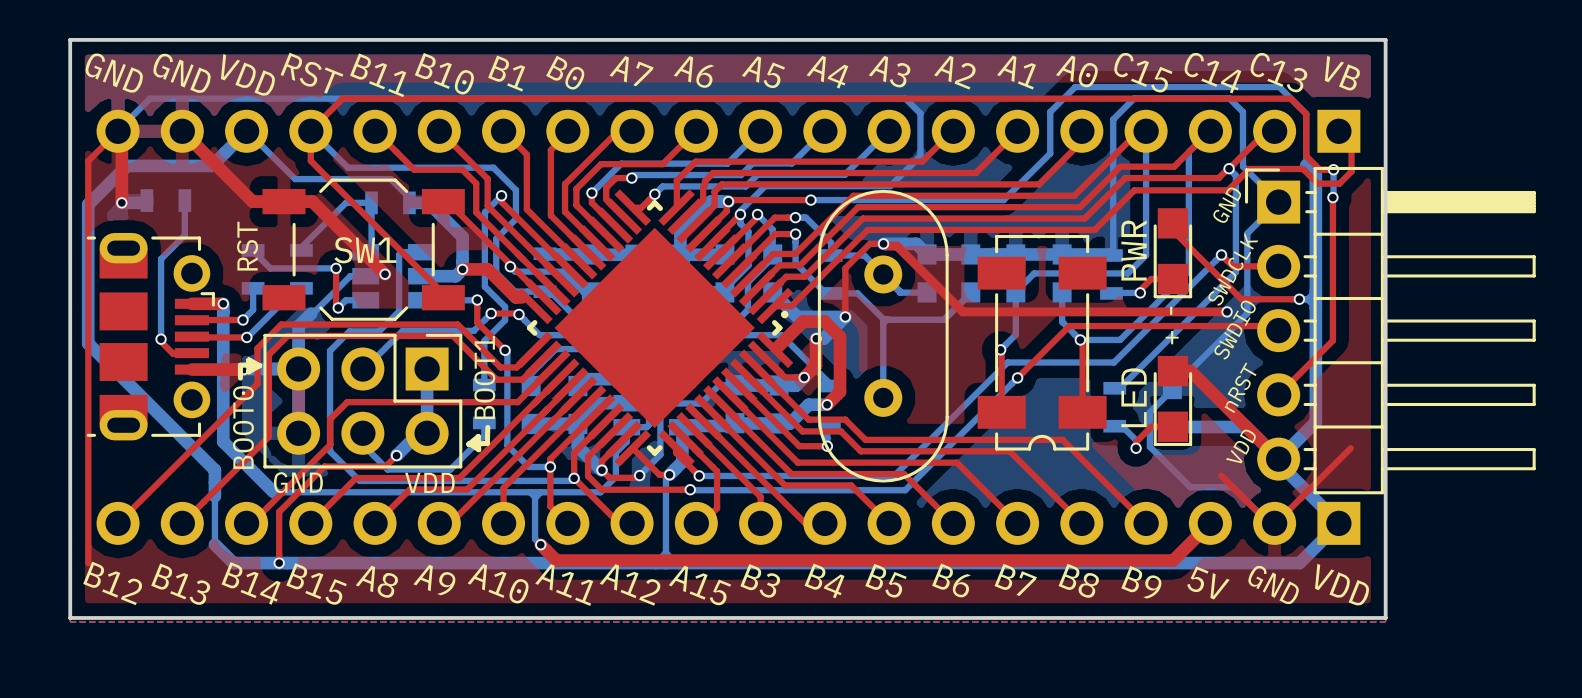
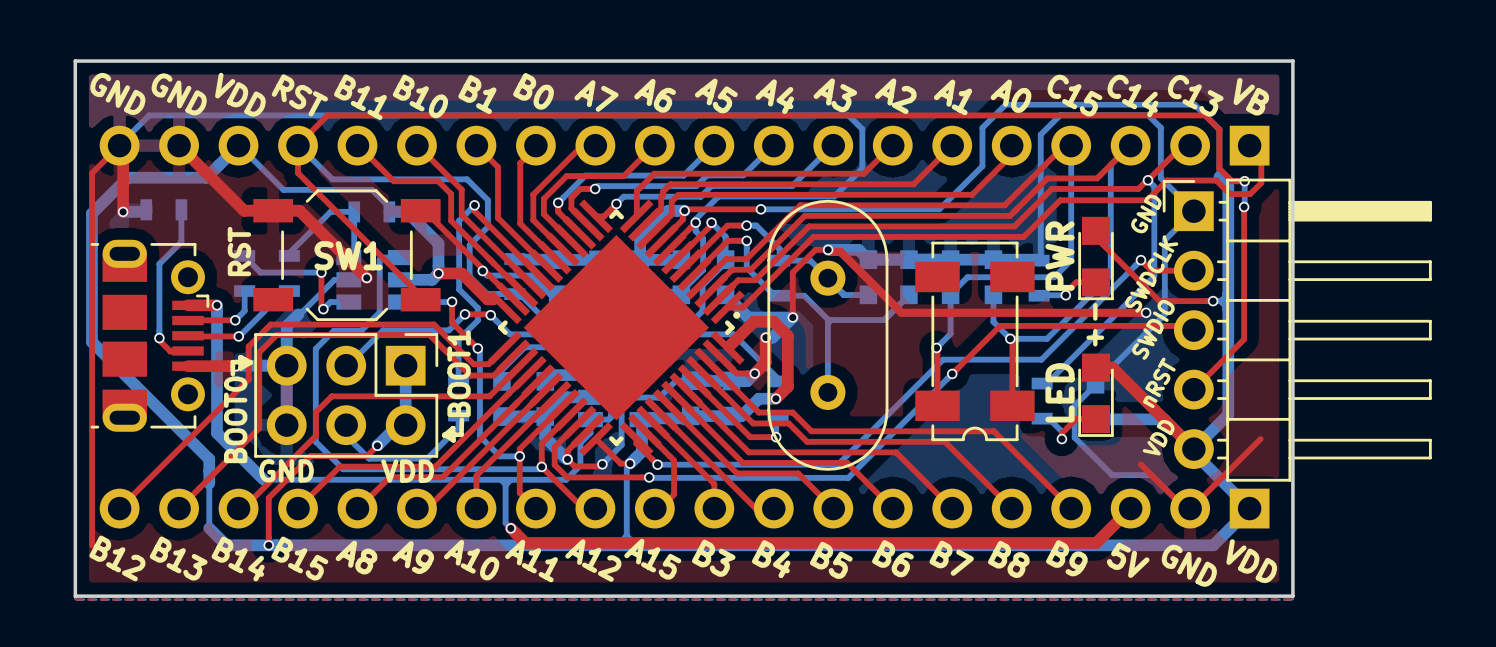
text rotation: 0° (631, 71) -> 6° clockwise (596, 96)
text rotation: 0° (694, 71) -> 6° clockwise (655, 95)
text rotation: 0° (889, 71) -> 6° clockwise (835, 95)
text rotation: 0° (1076, 71) -> 6° clockwise (1011, 96)
text rotation: 0° (763, 72) -> 11.5° clockwise (716, 95)
text rotation: 0° (827, 72) -> 6° clockwise (774, 96)
text rotation: 0° (954, 72) -> 6° clockwise (895, 96)
text rotation: 0° (1016, 72) -> 6° clockwise (953, 97)
text rotation: 0° (1143, 72) -> 6° clockwise (1074, 95)
text rotation: 0° (1212, 72) -> 6° clockwise (1132, 95)
text rotation: 0° (1278, 72) -> 6° clockwise (1195, 95)
text rotation: 0° (114, 73) -> 6° clockwise (117, 93)
text rotation: 0° (182, 73) -> 6° clockwise (179, 94)
text rotation: 0° (311, 73) -> 6° clockwise (299, 95)
text rotation: 0° (444, 73) -> 6° clockwise (420, 96)
text rotation: 0° (506, 73) -> 6° clockwise (477, 94)
text rotation: 0° (1342, 73) -> 6° clockwise (1251, 96)
text rotation: 0° (248, 75) -> 6° clockwise (240, 94)
text rotation: 0° (378, 75) -> 6° clockwise (360, 97)
text rotation: 0° (1015, 579) -> 6° clockwise (951, 558)
text rotation: 0° (434, 580) -> 6° clockwise (413, 557)
text rotation: 0° (760, 580) -> 6° clockwise (713, 558)
text rotation: 0° (824, 580) -> 6° clockwise (771, 559)
text rotation: 0° (885, 580) -> 6° clockwise (831, 560)
text rotation: 0° (951, 580) -> 6° clockwise (892, 558)
text rotation: 0° (1079, 580) -> 6° clockwise (1008, 559)
text rotation: 0° (377, 581) -> 6° clockwise (356, 557)
text rotation: 0° (1141, 582) -> 6° clockwise (1066, 558)
text rotation: 0° (1208, 582) -> 6° clockwise (1128, 560)
text rotation: 0° (112, 583) -> 6° clockwise (117, 558)
text rotation: 0° (251, 583) -> 6° clockwise (238, 558)
text rotation: 0° (316, 583) -> 6° clockwise (299, 558)
text rotation: 0° (498, 583) -> 6° clockwise (471, 560)
text rotation: 0° (180, 584) -> 6° clockwise (178, 558)
text rotation: 0° (630, 584) -> 6° clockwise (593, 560)
text rotation: 0° (564, 585) -> 6° clockwise (531, 561)
text rotation: 0° (699, 585) -> 6° clockwise (652, 559)
text rotation: 0° (1342, 585) -> 6° clockwise (1251, 561)

